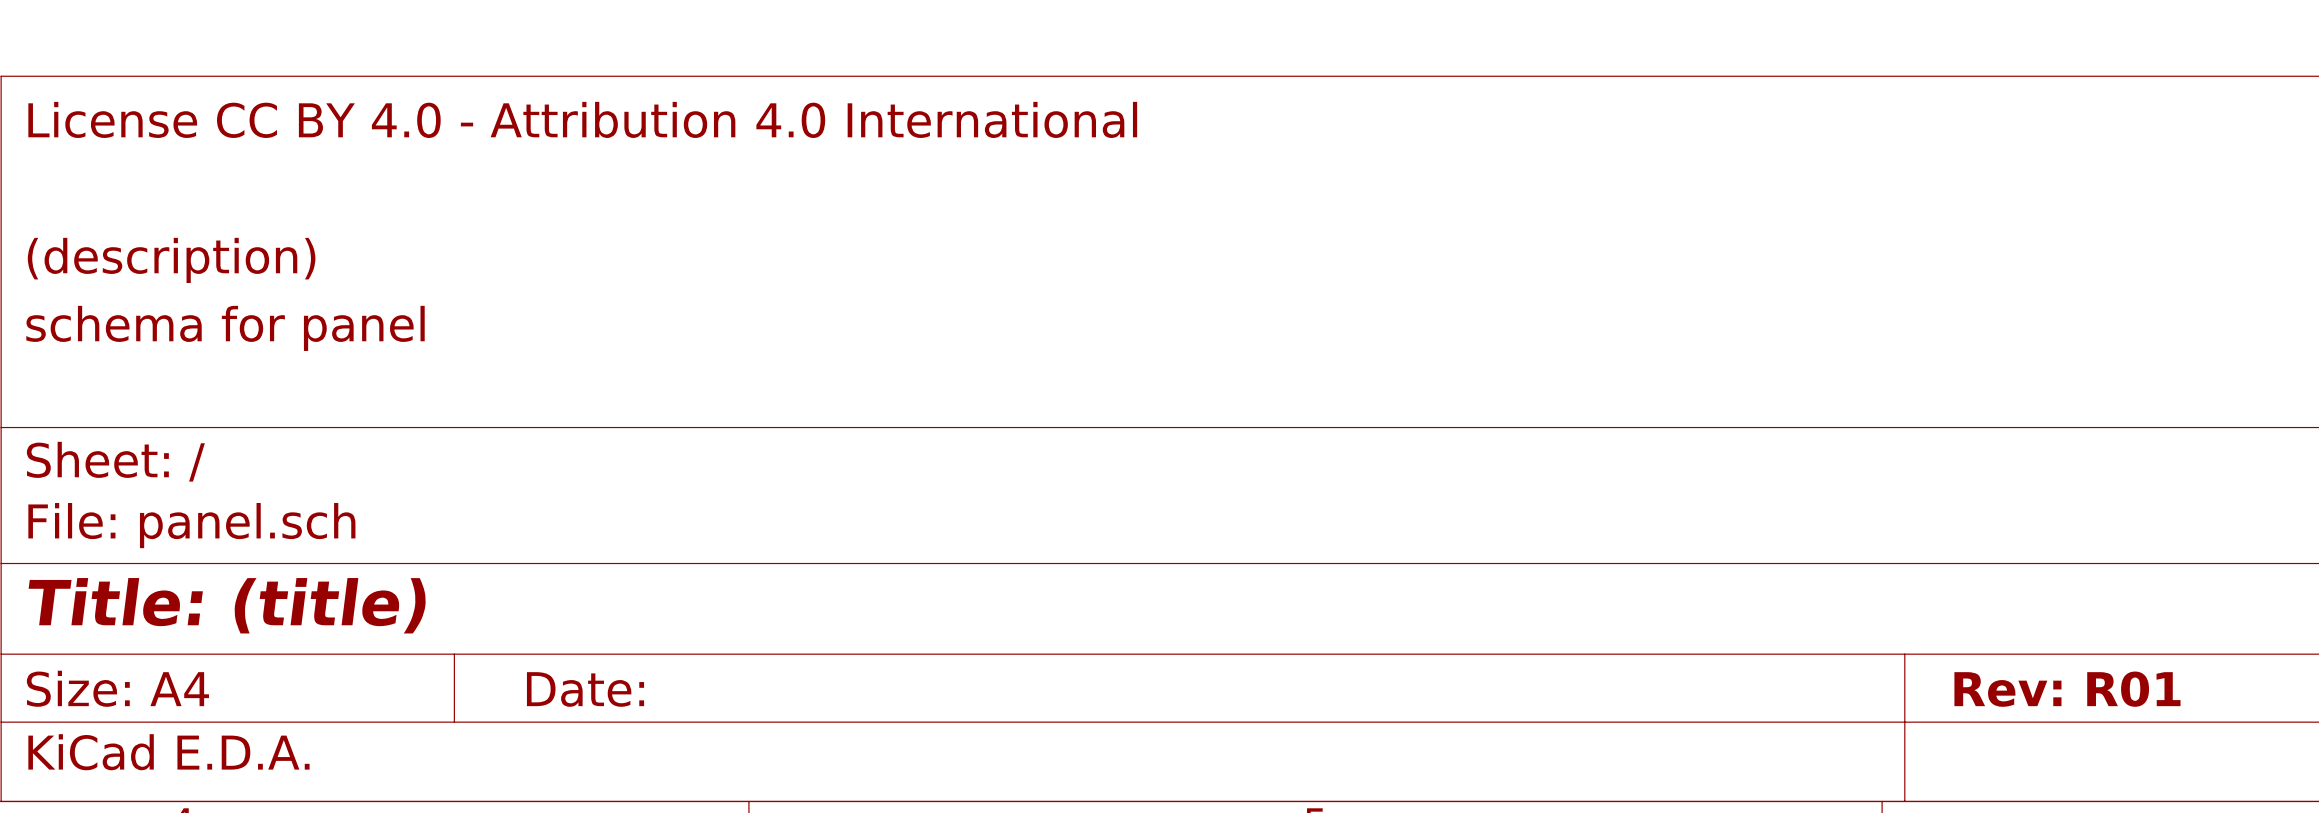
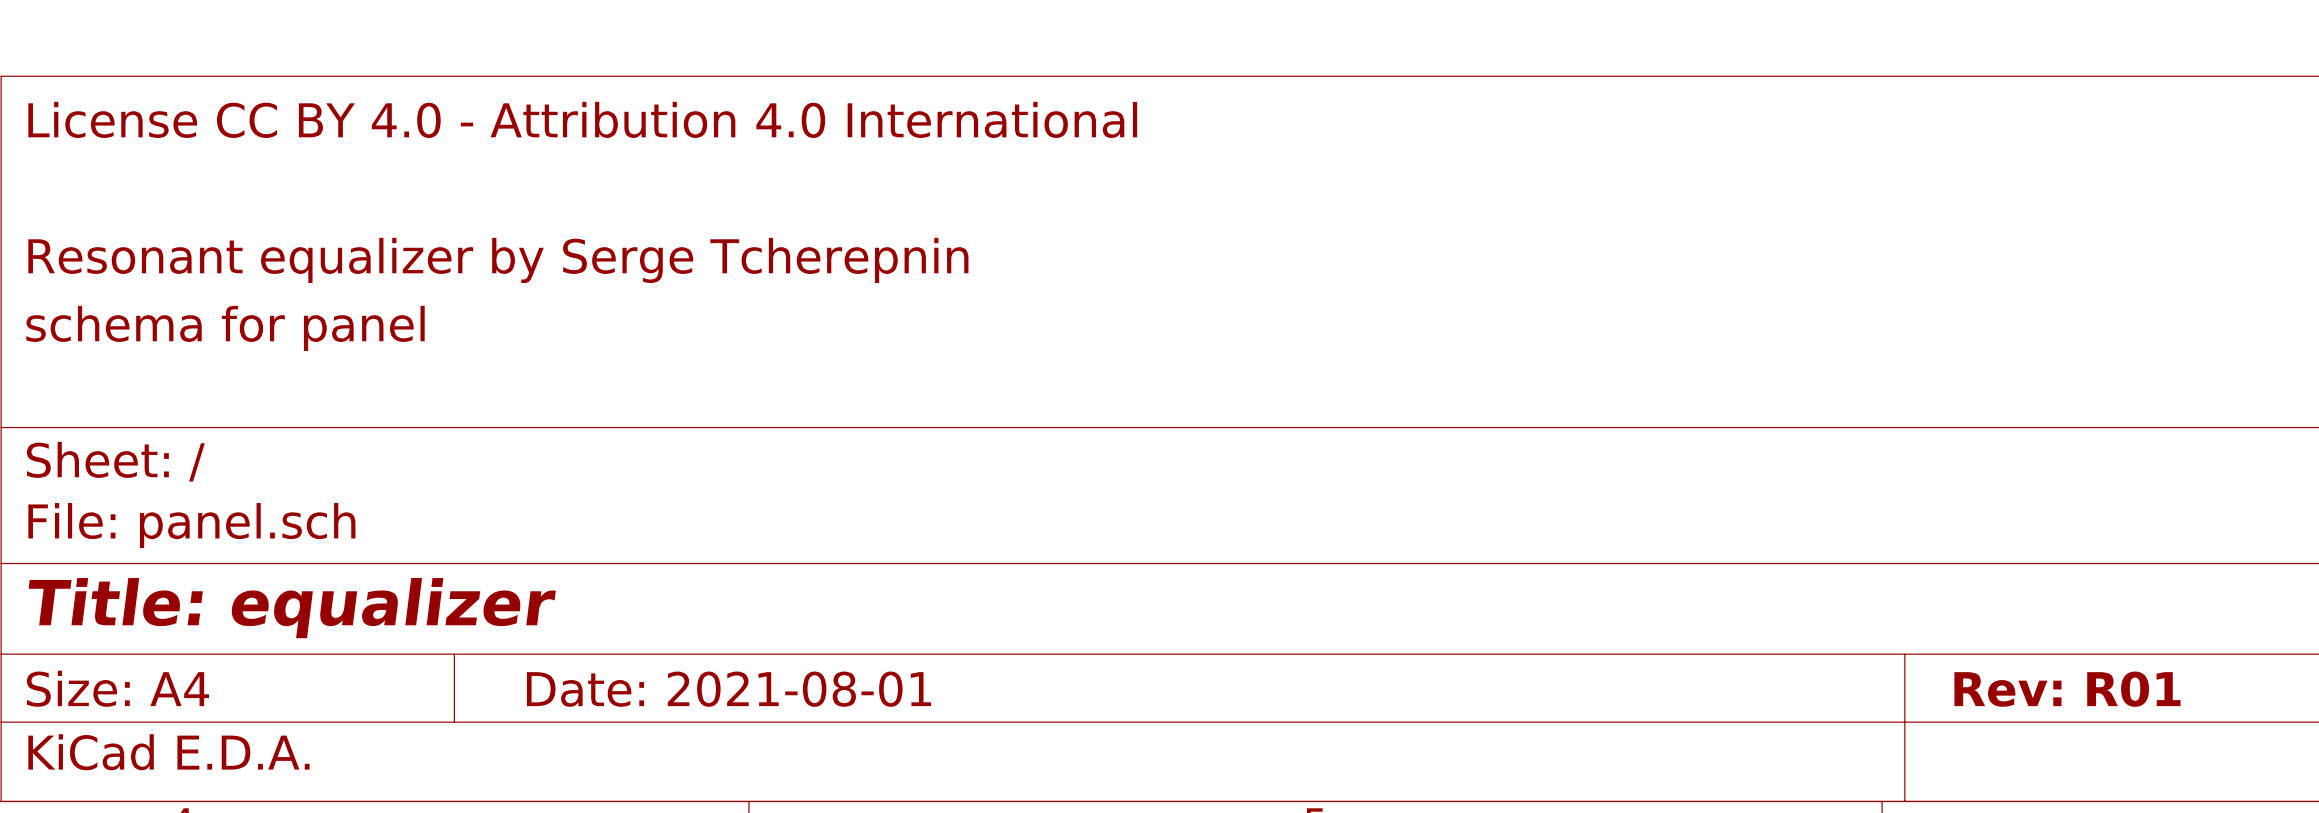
title block: (description) (171, 260) -> Resonant equalizer by Serge Tcherepnin (498, 260)
title block: Title: (title) (227, 605) -> Title: equalizer (292, 608)
title block: Date: (585, 689) -> Date: 2021-08-01 (728, 689)

